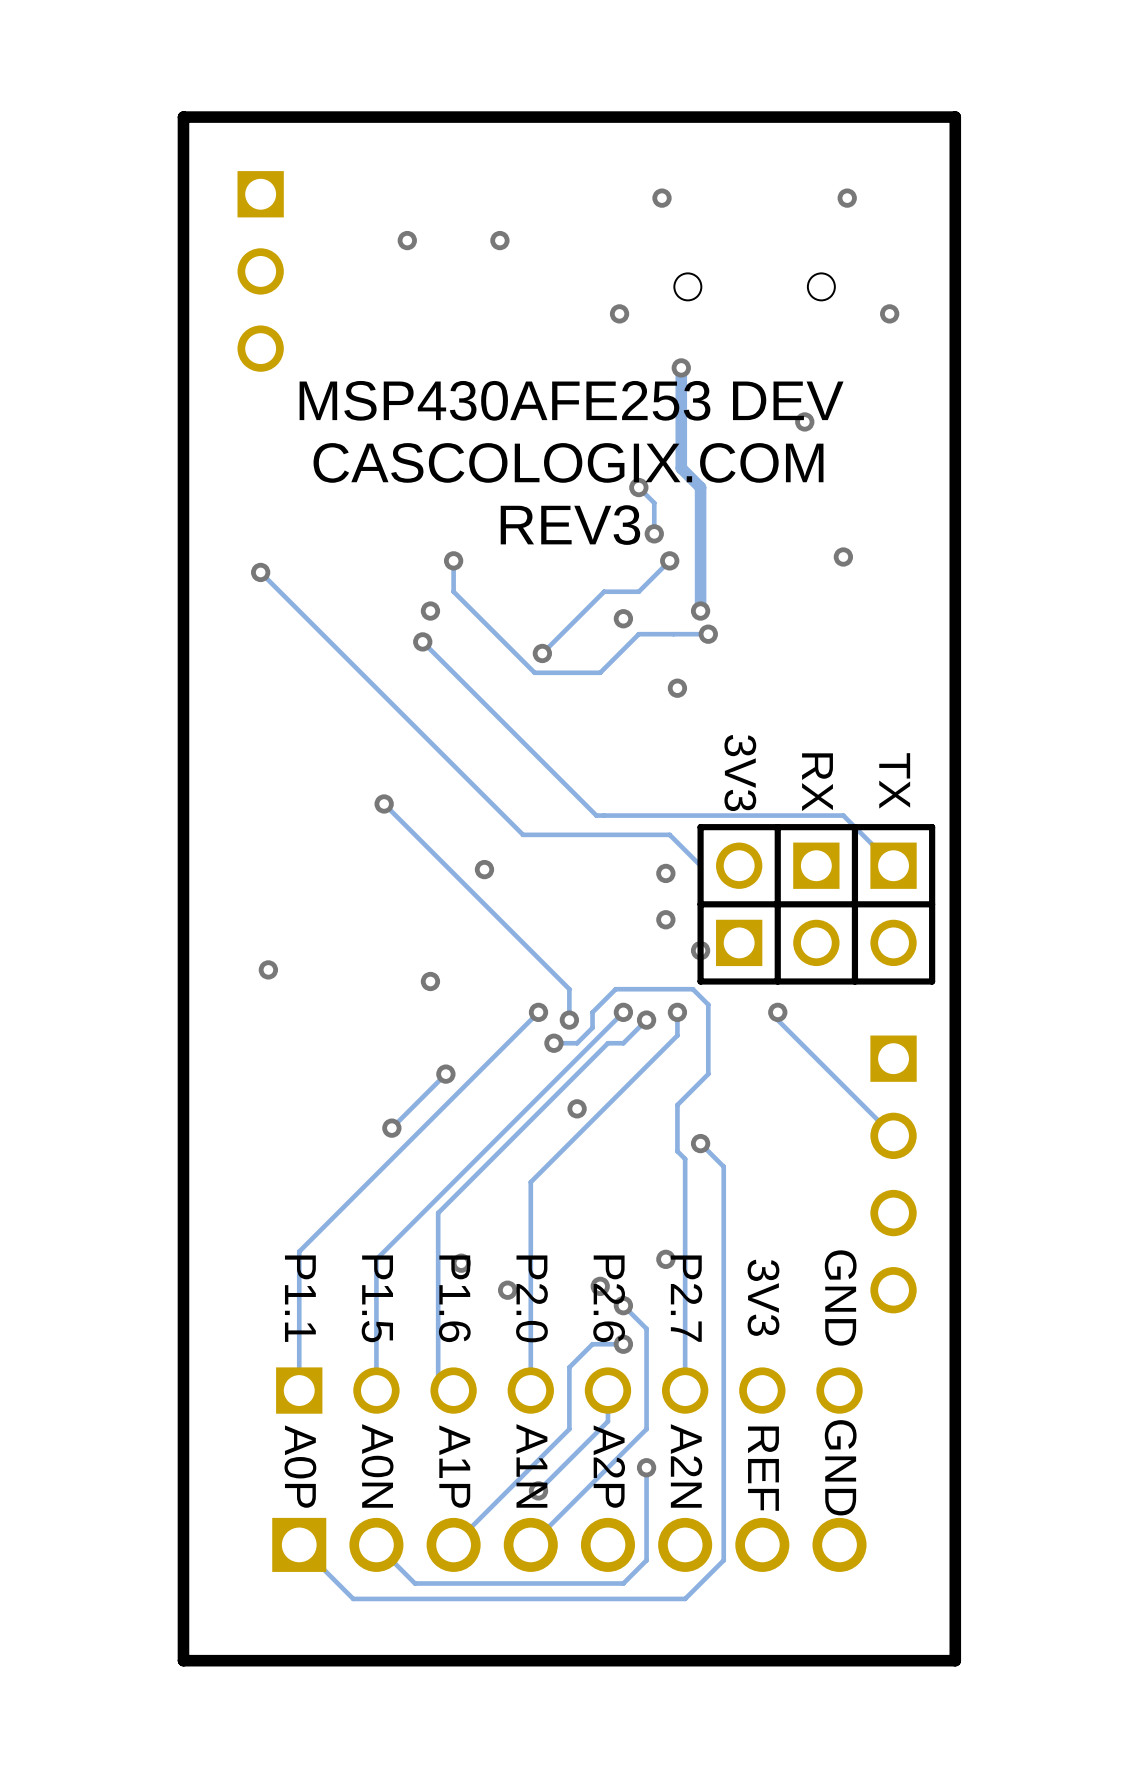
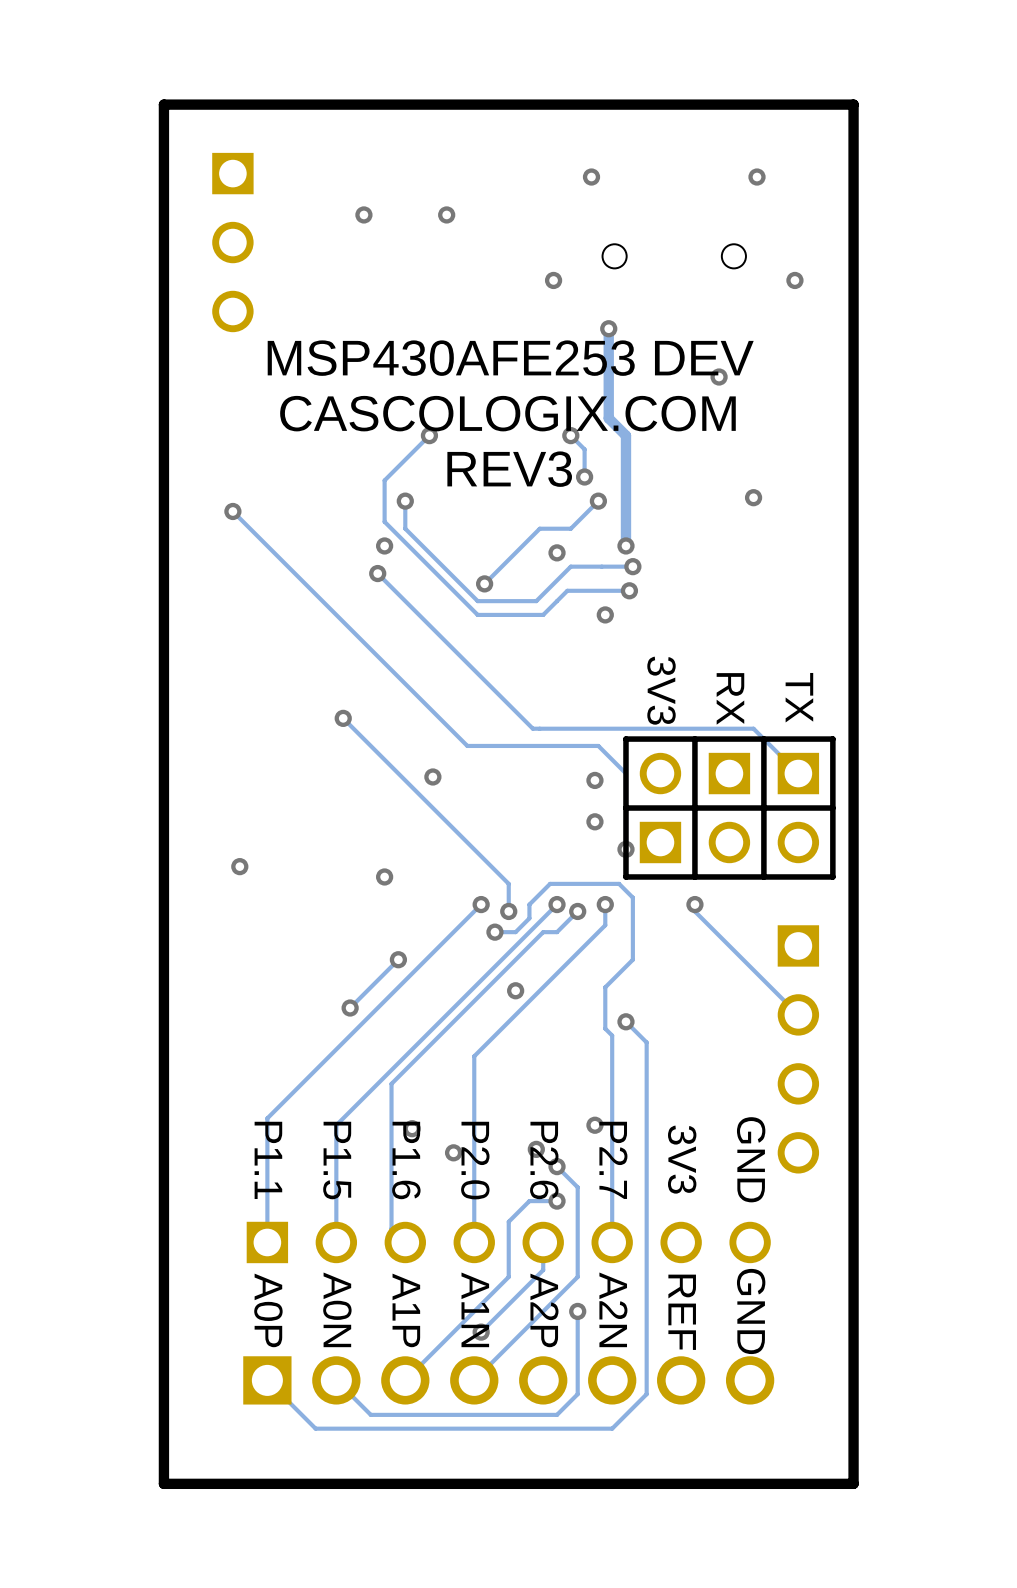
track: none -> (429, 435) (384, 480) (384, 521) (477, 614) (543, 614) (567, 590) (629, 590)
via: none -> (429, 435)
via: none -> (629, 590)

